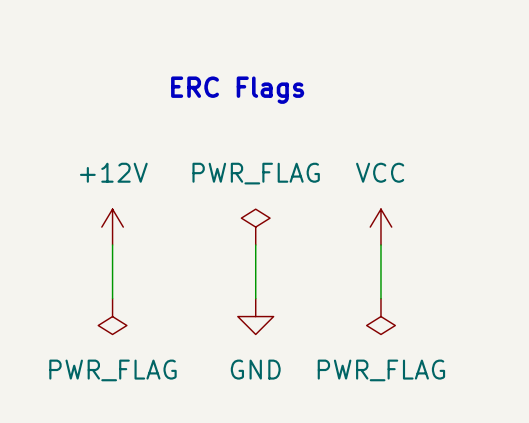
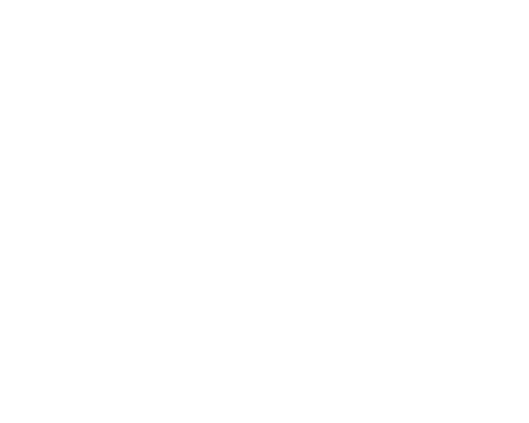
text: ERC Flags (237, 90) -> none
power symbol: +12V (112, 227) -> none
power symbol: PWR_FLAG (255, 227) -> none
power symbol: VCC (380, 227) -> none
wire: (112, 244) (112, 298) -> none
wire: (255, 244) (255, 298) -> none
wire: (380, 244) (380, 298) -> none
power symbol: PWR_FLAG (112, 316) -> none
power symbol: GND (255, 316) -> none
power symbol: PWR_FLAG (380, 316) -> none

